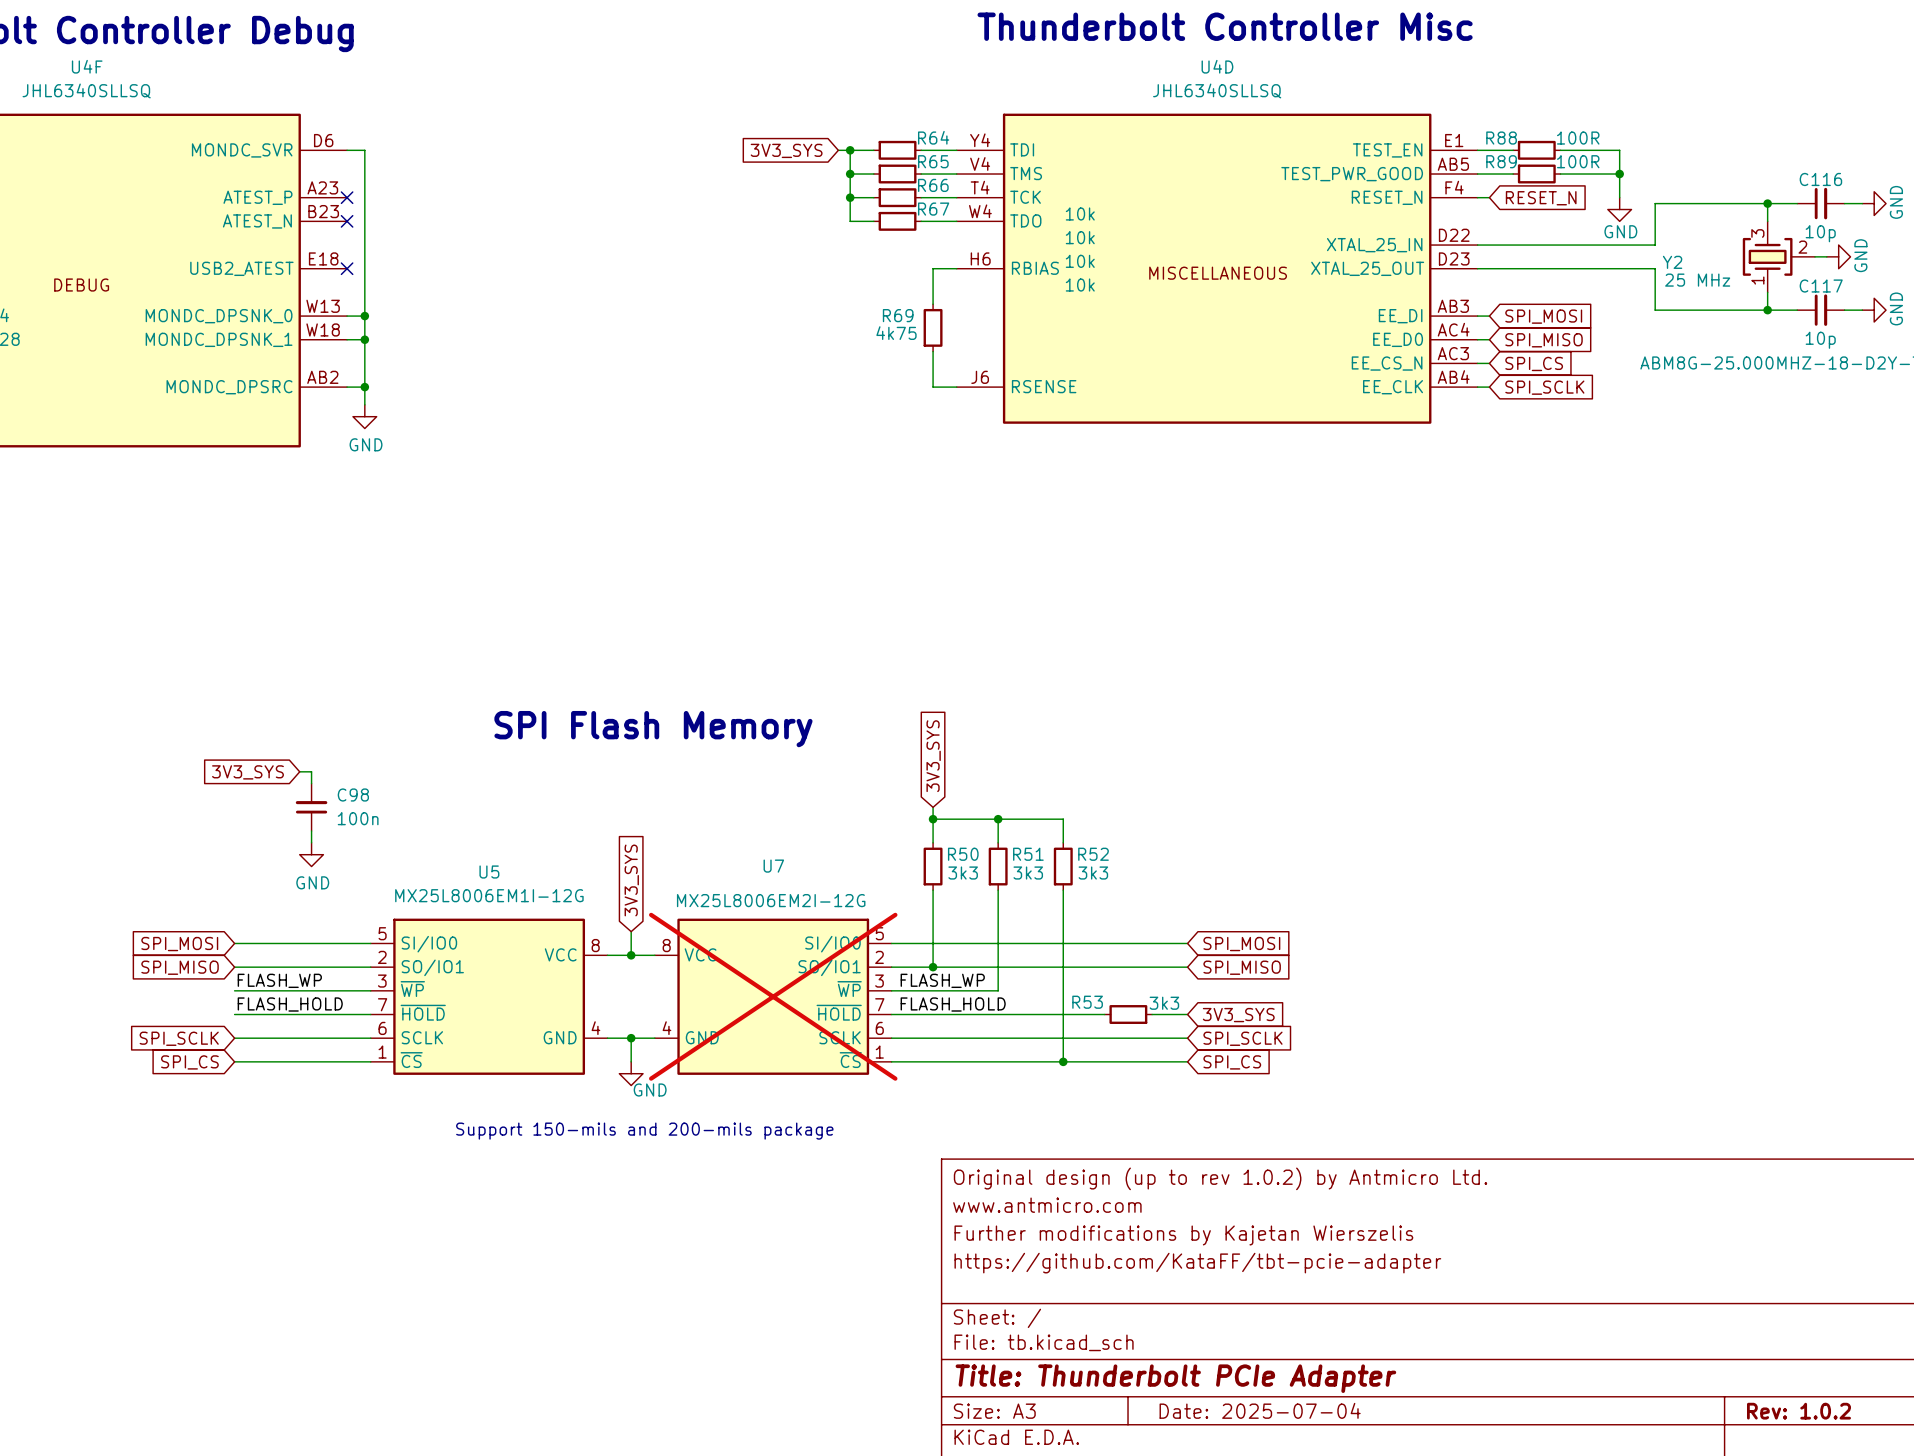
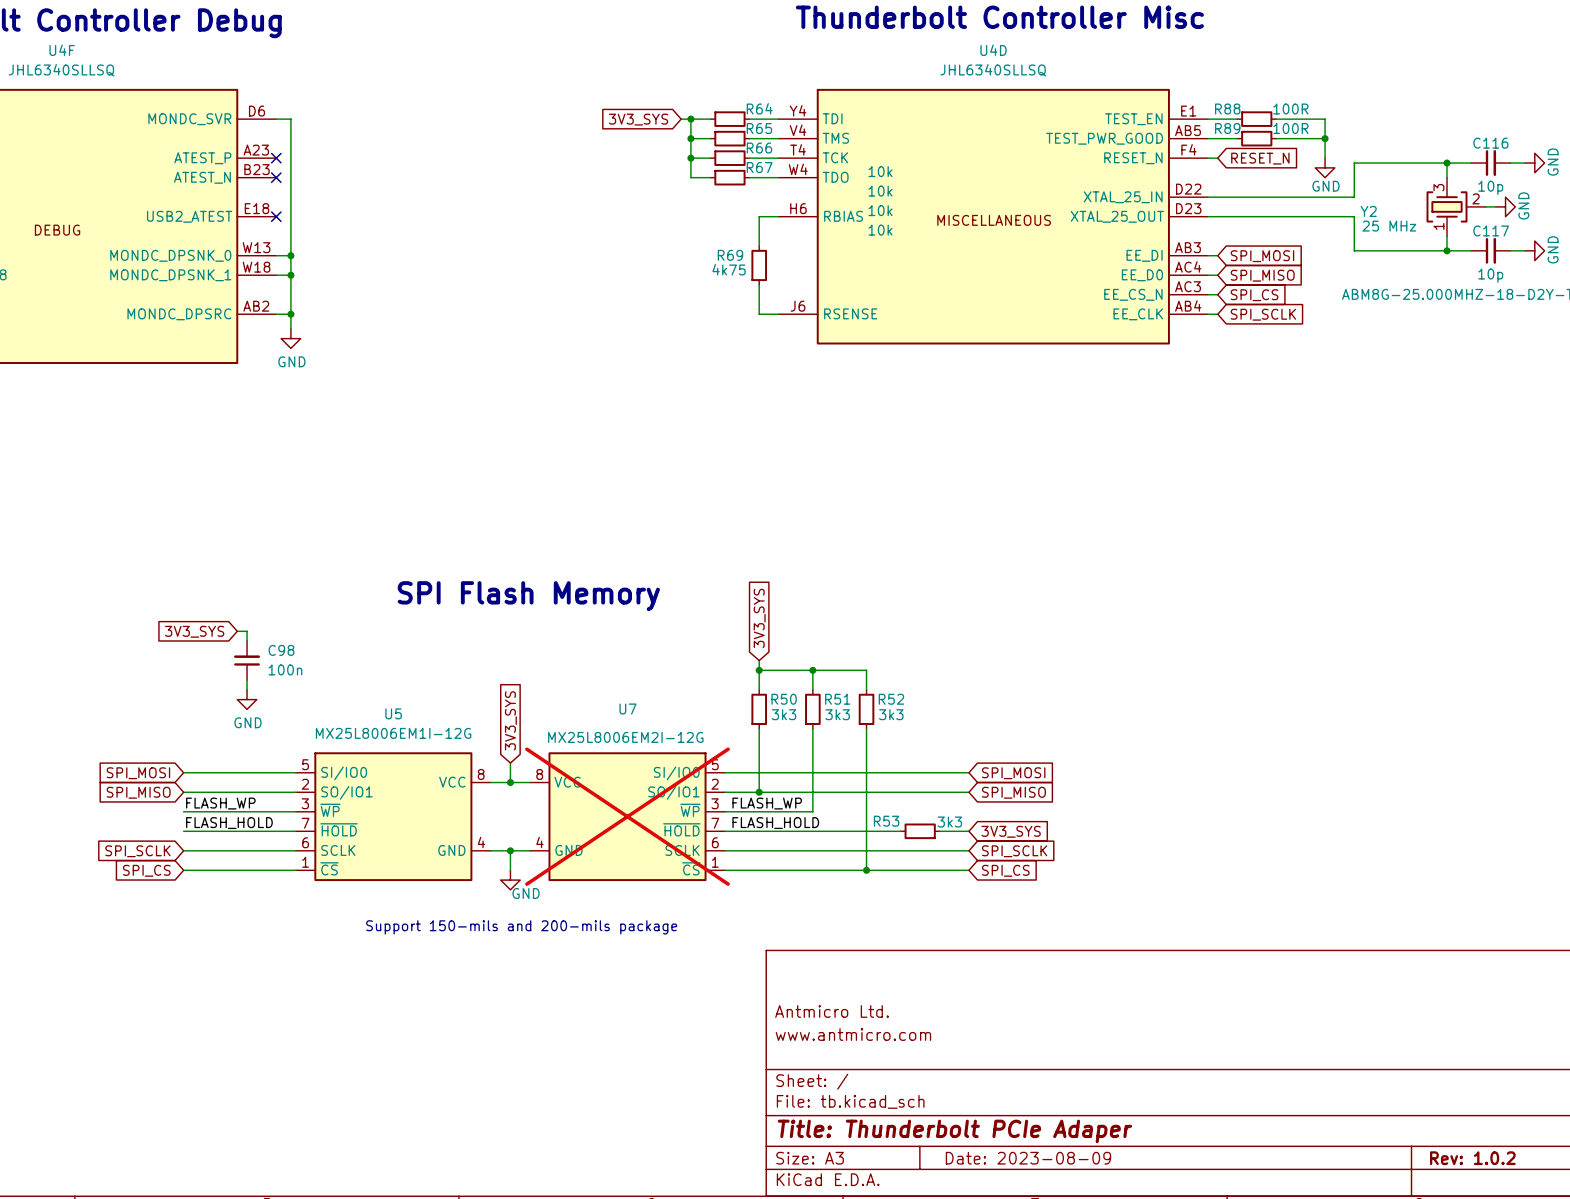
title block: Original design (up to rev 1.0.2) by Antmicro Ltd. (1220, 1178) -> none
title block: www.antmicro.com (1047, 1205) -> none
title block: Further modifications by Kajetan Wierszelis (1183, 1235) -> Antmicro Ltd. (832, 1011)
title block: https://github.com/KataFF/tbt-pcie-adapter (1197, 1263) -> www.antmicro.com (853, 1034)
title block: Title: Thunderbolt PCIe Adapter (1175, 1378) -> Title: Thunderbolt PCIe Adaper (954, 1131)
title block: Date: 2025-07-04 (1260, 1410) -> Date: 2023-08-09 (1028, 1158)

